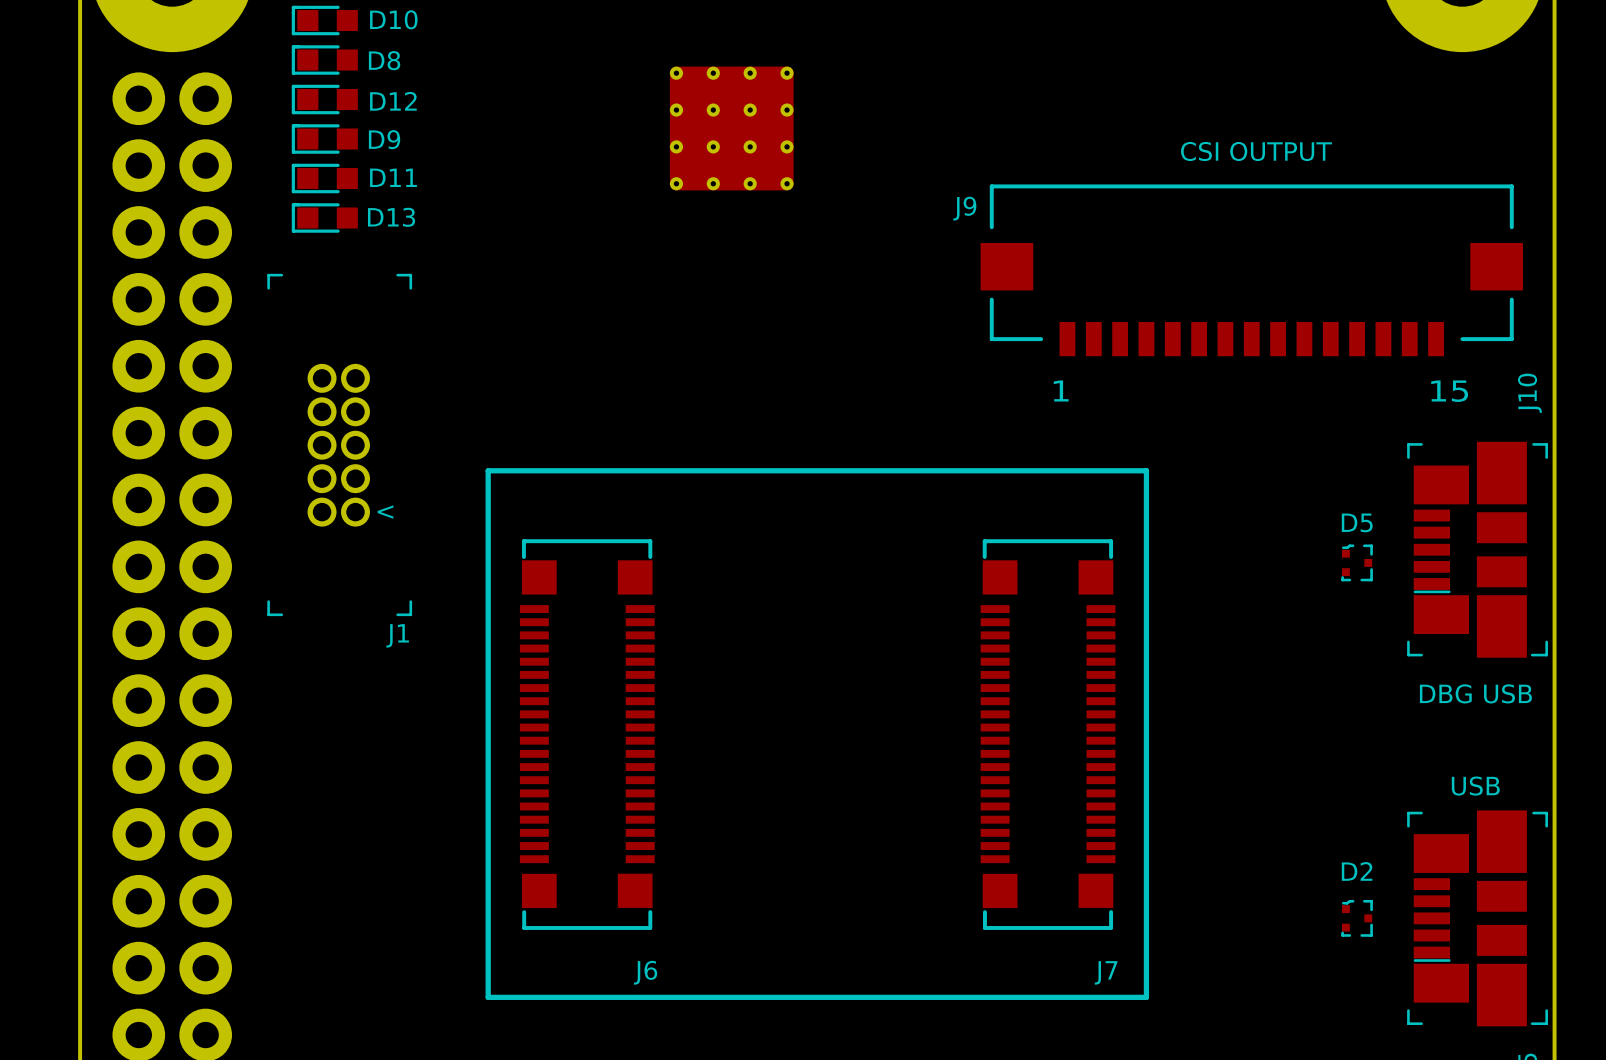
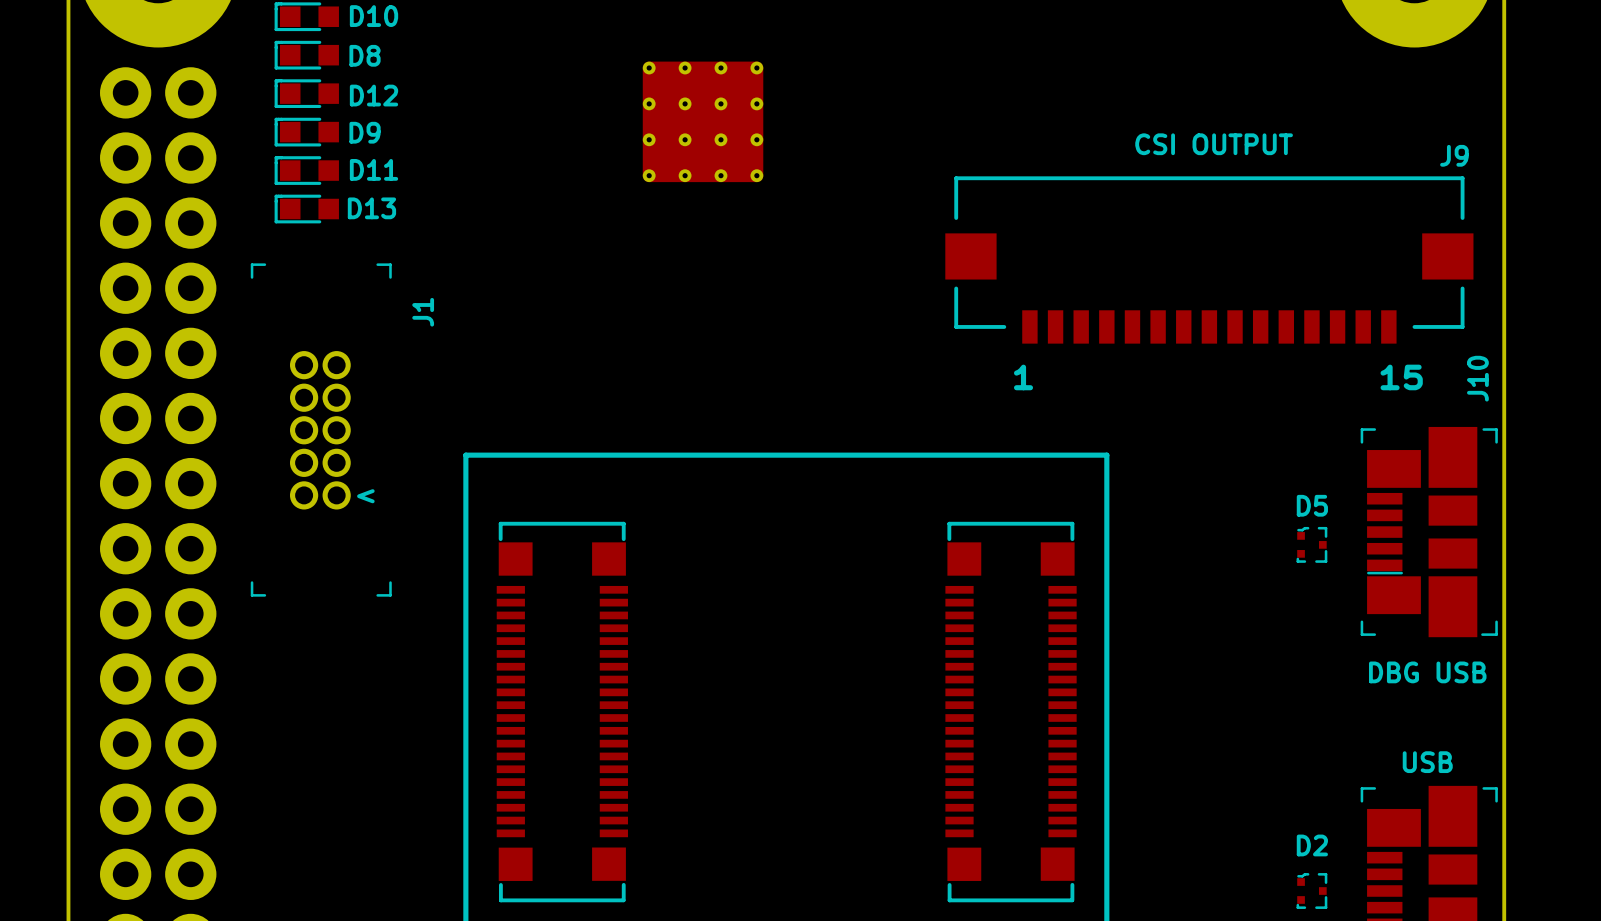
J9 name position: J9 (964, 208) -> J9 (1454, 155)
J1 name rotation: 0° (397, 635) -> 90° counterclockwise (423, 312)
J1 name position: J1 (397, 635) -> J1 (423, 312)

